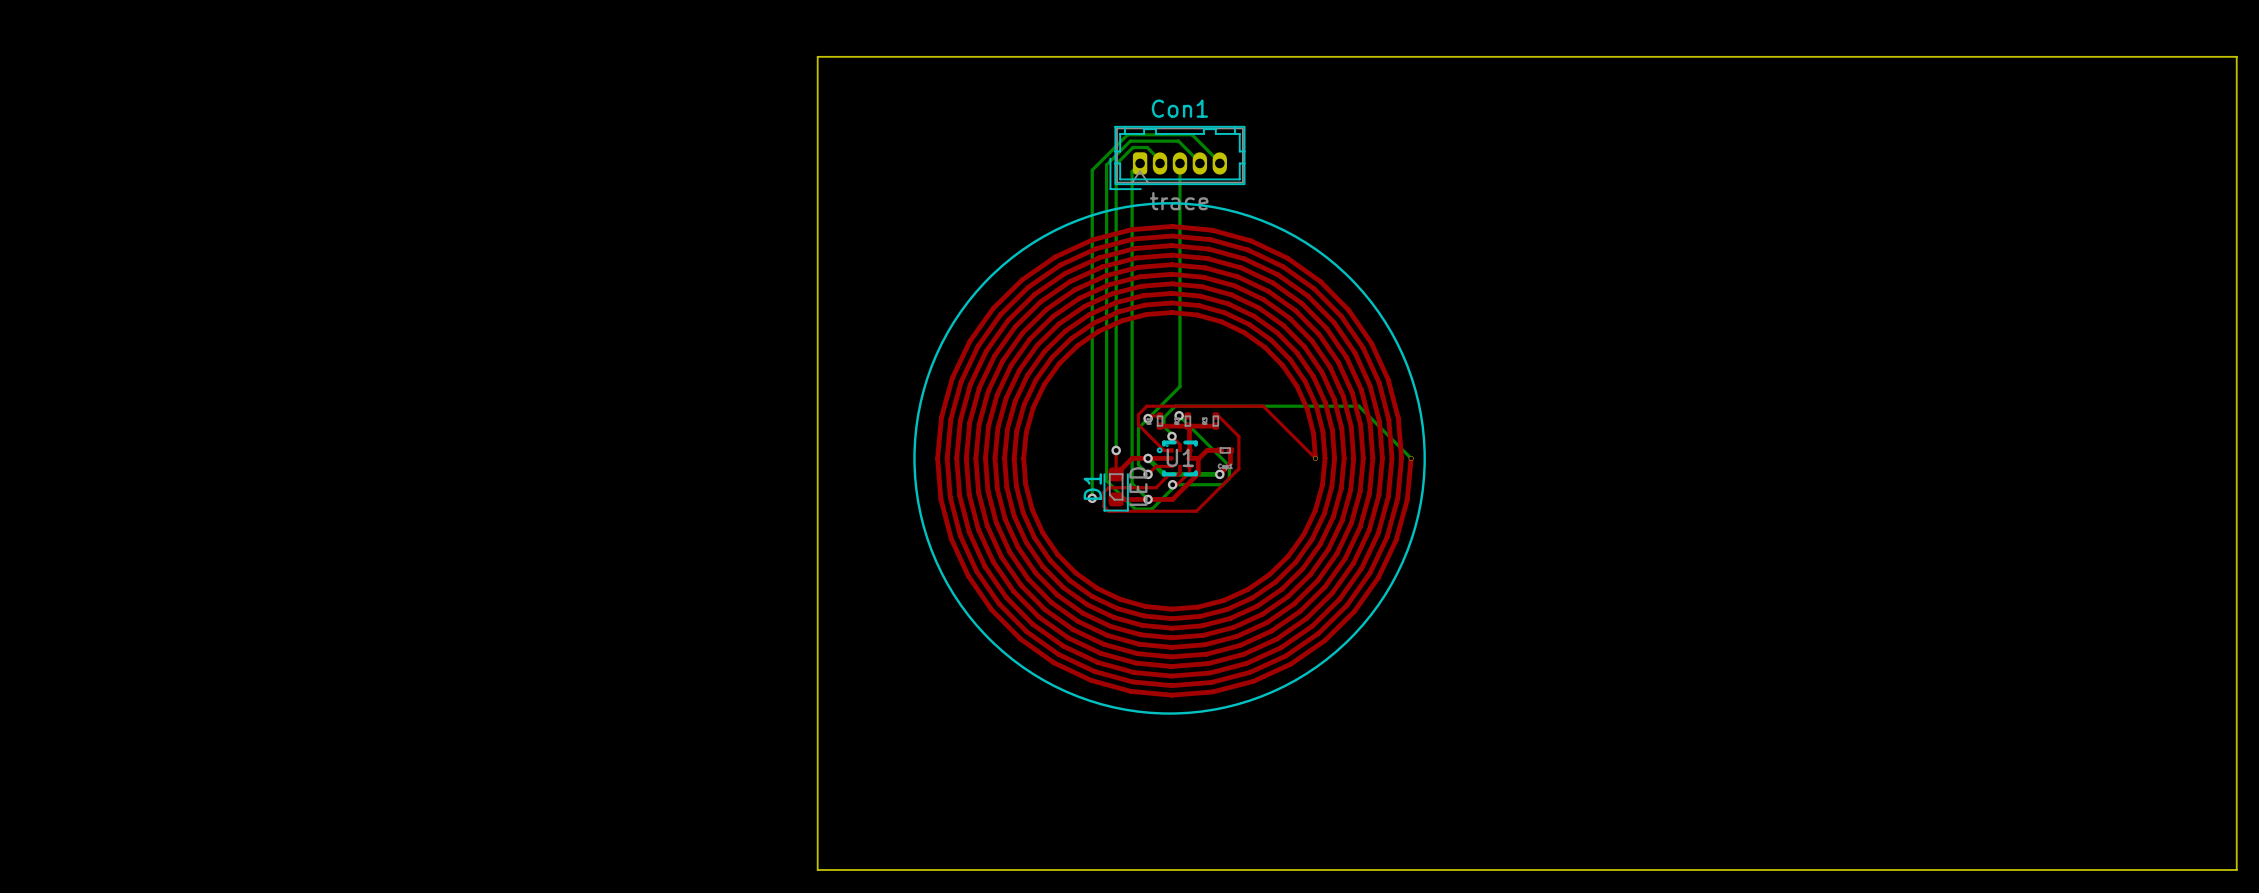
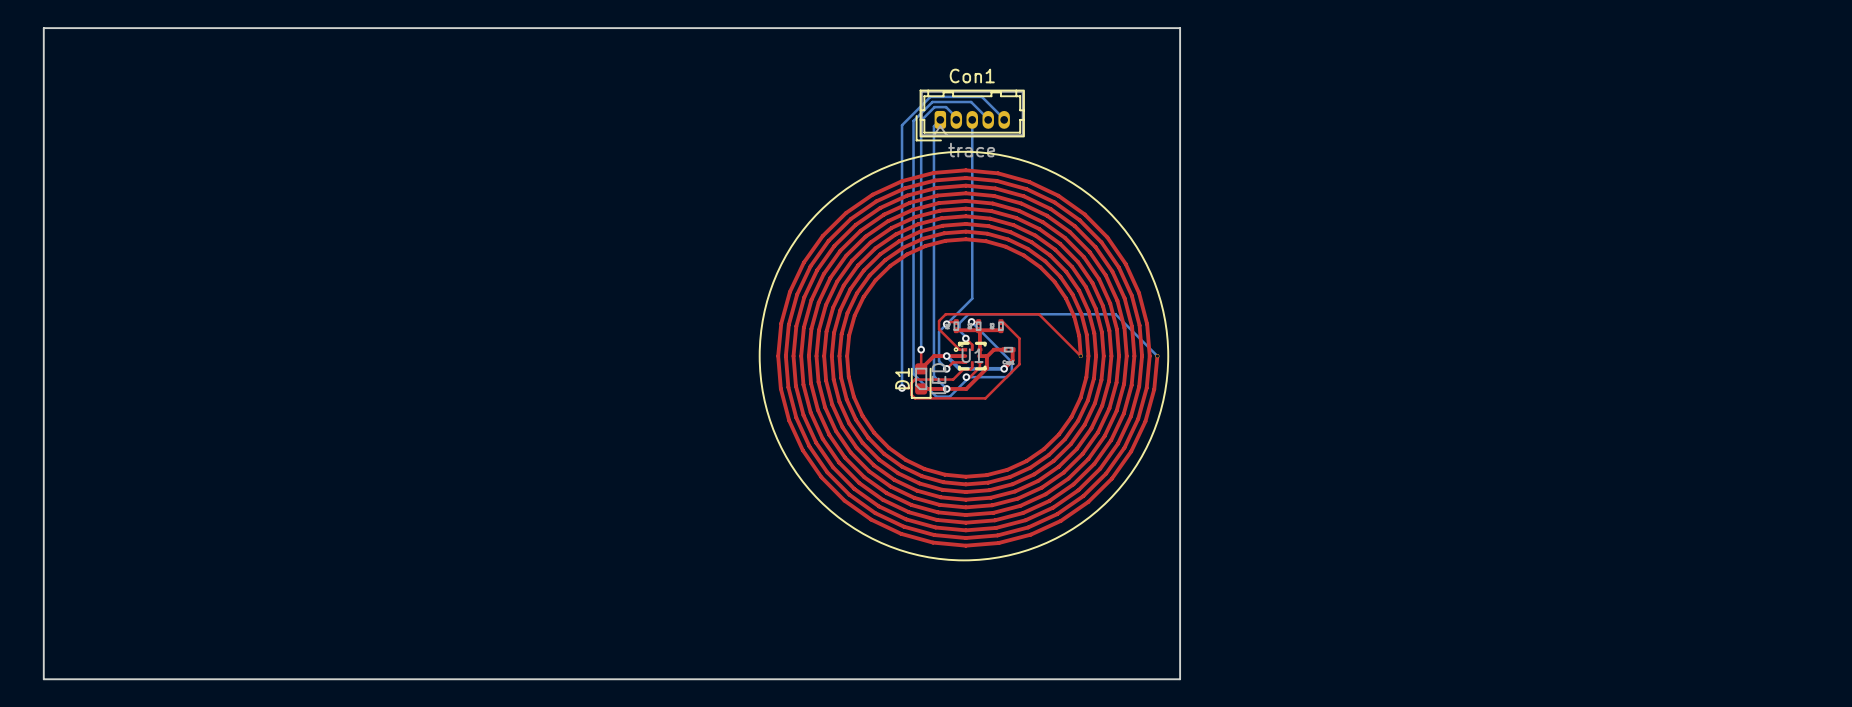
board edge: none -> (43, 28) (1180, 28) (1180, 679) (43, 679) (43, 28)
board edge: (817, 56) (2236, 56) (2236, 869) (817, 869) (817, 56) -> none

